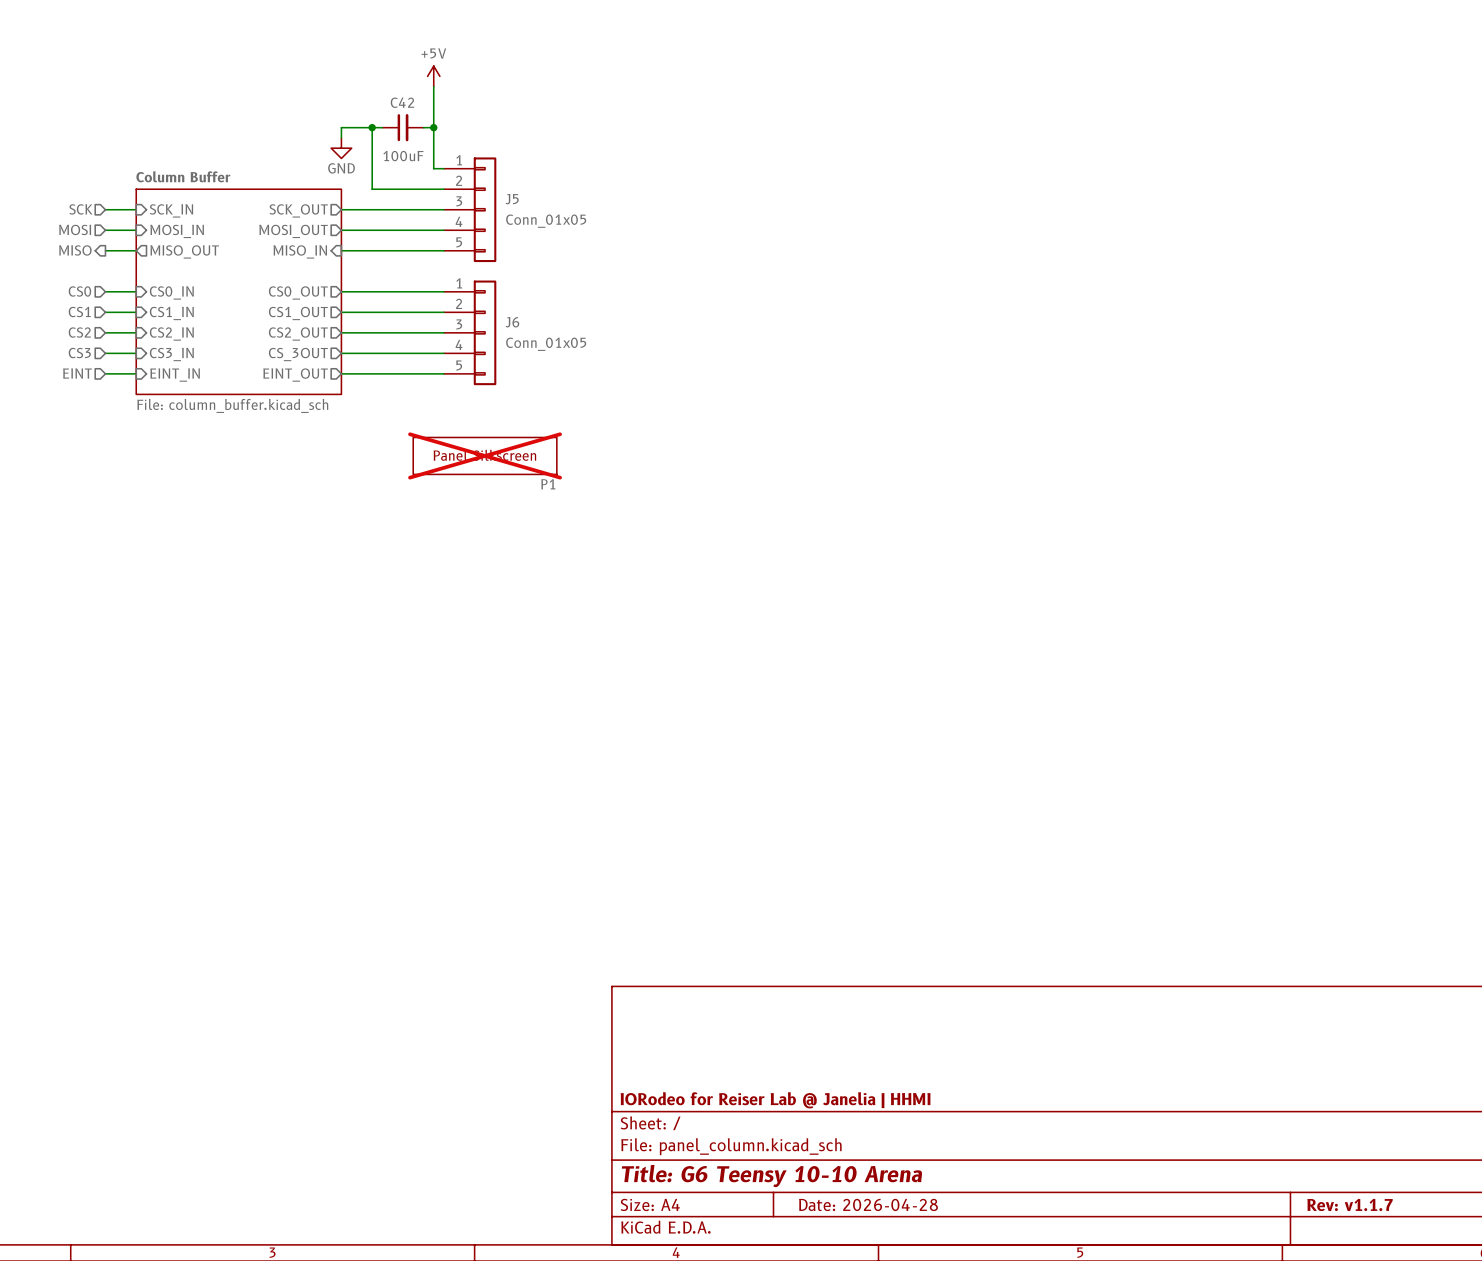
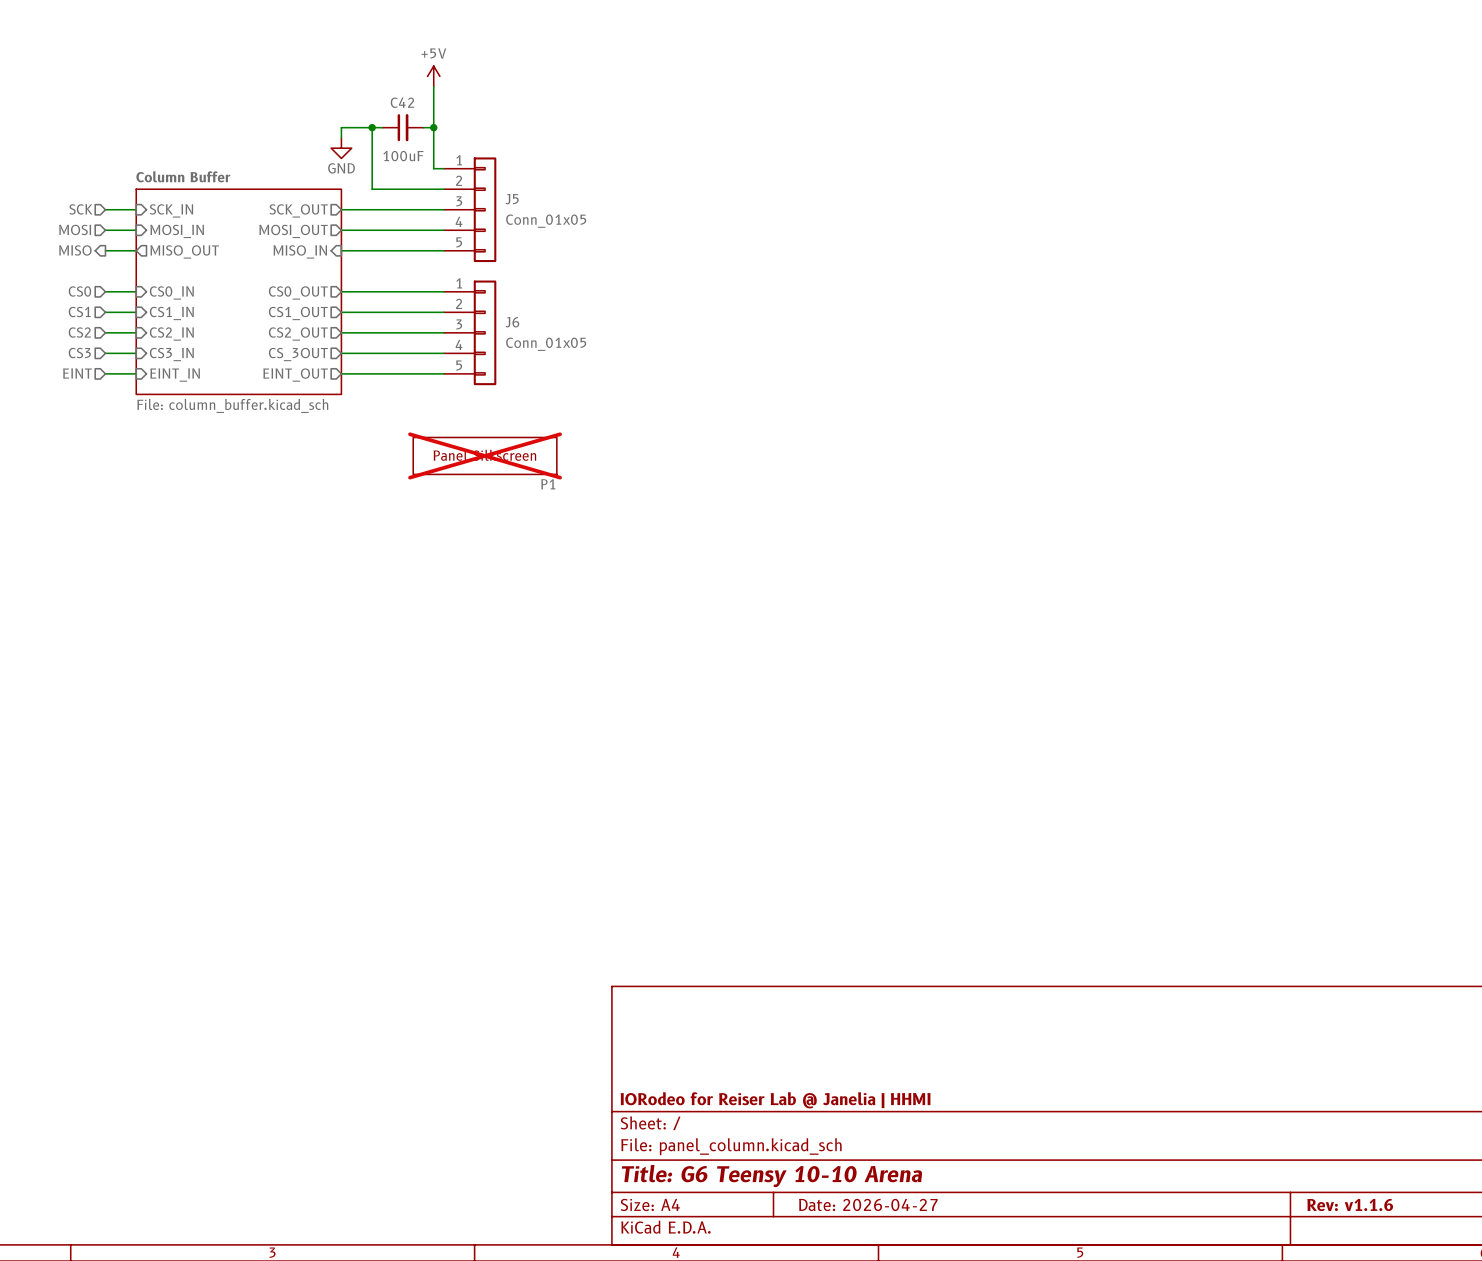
title block: Date: 2026-04-28 (868, 1204) -> Date: 2026-04-27 (868, 1204)
title block: Rev: v1.1.7 (1349, 1204) -> Rev: v1.1.6 (1350, 1204)

